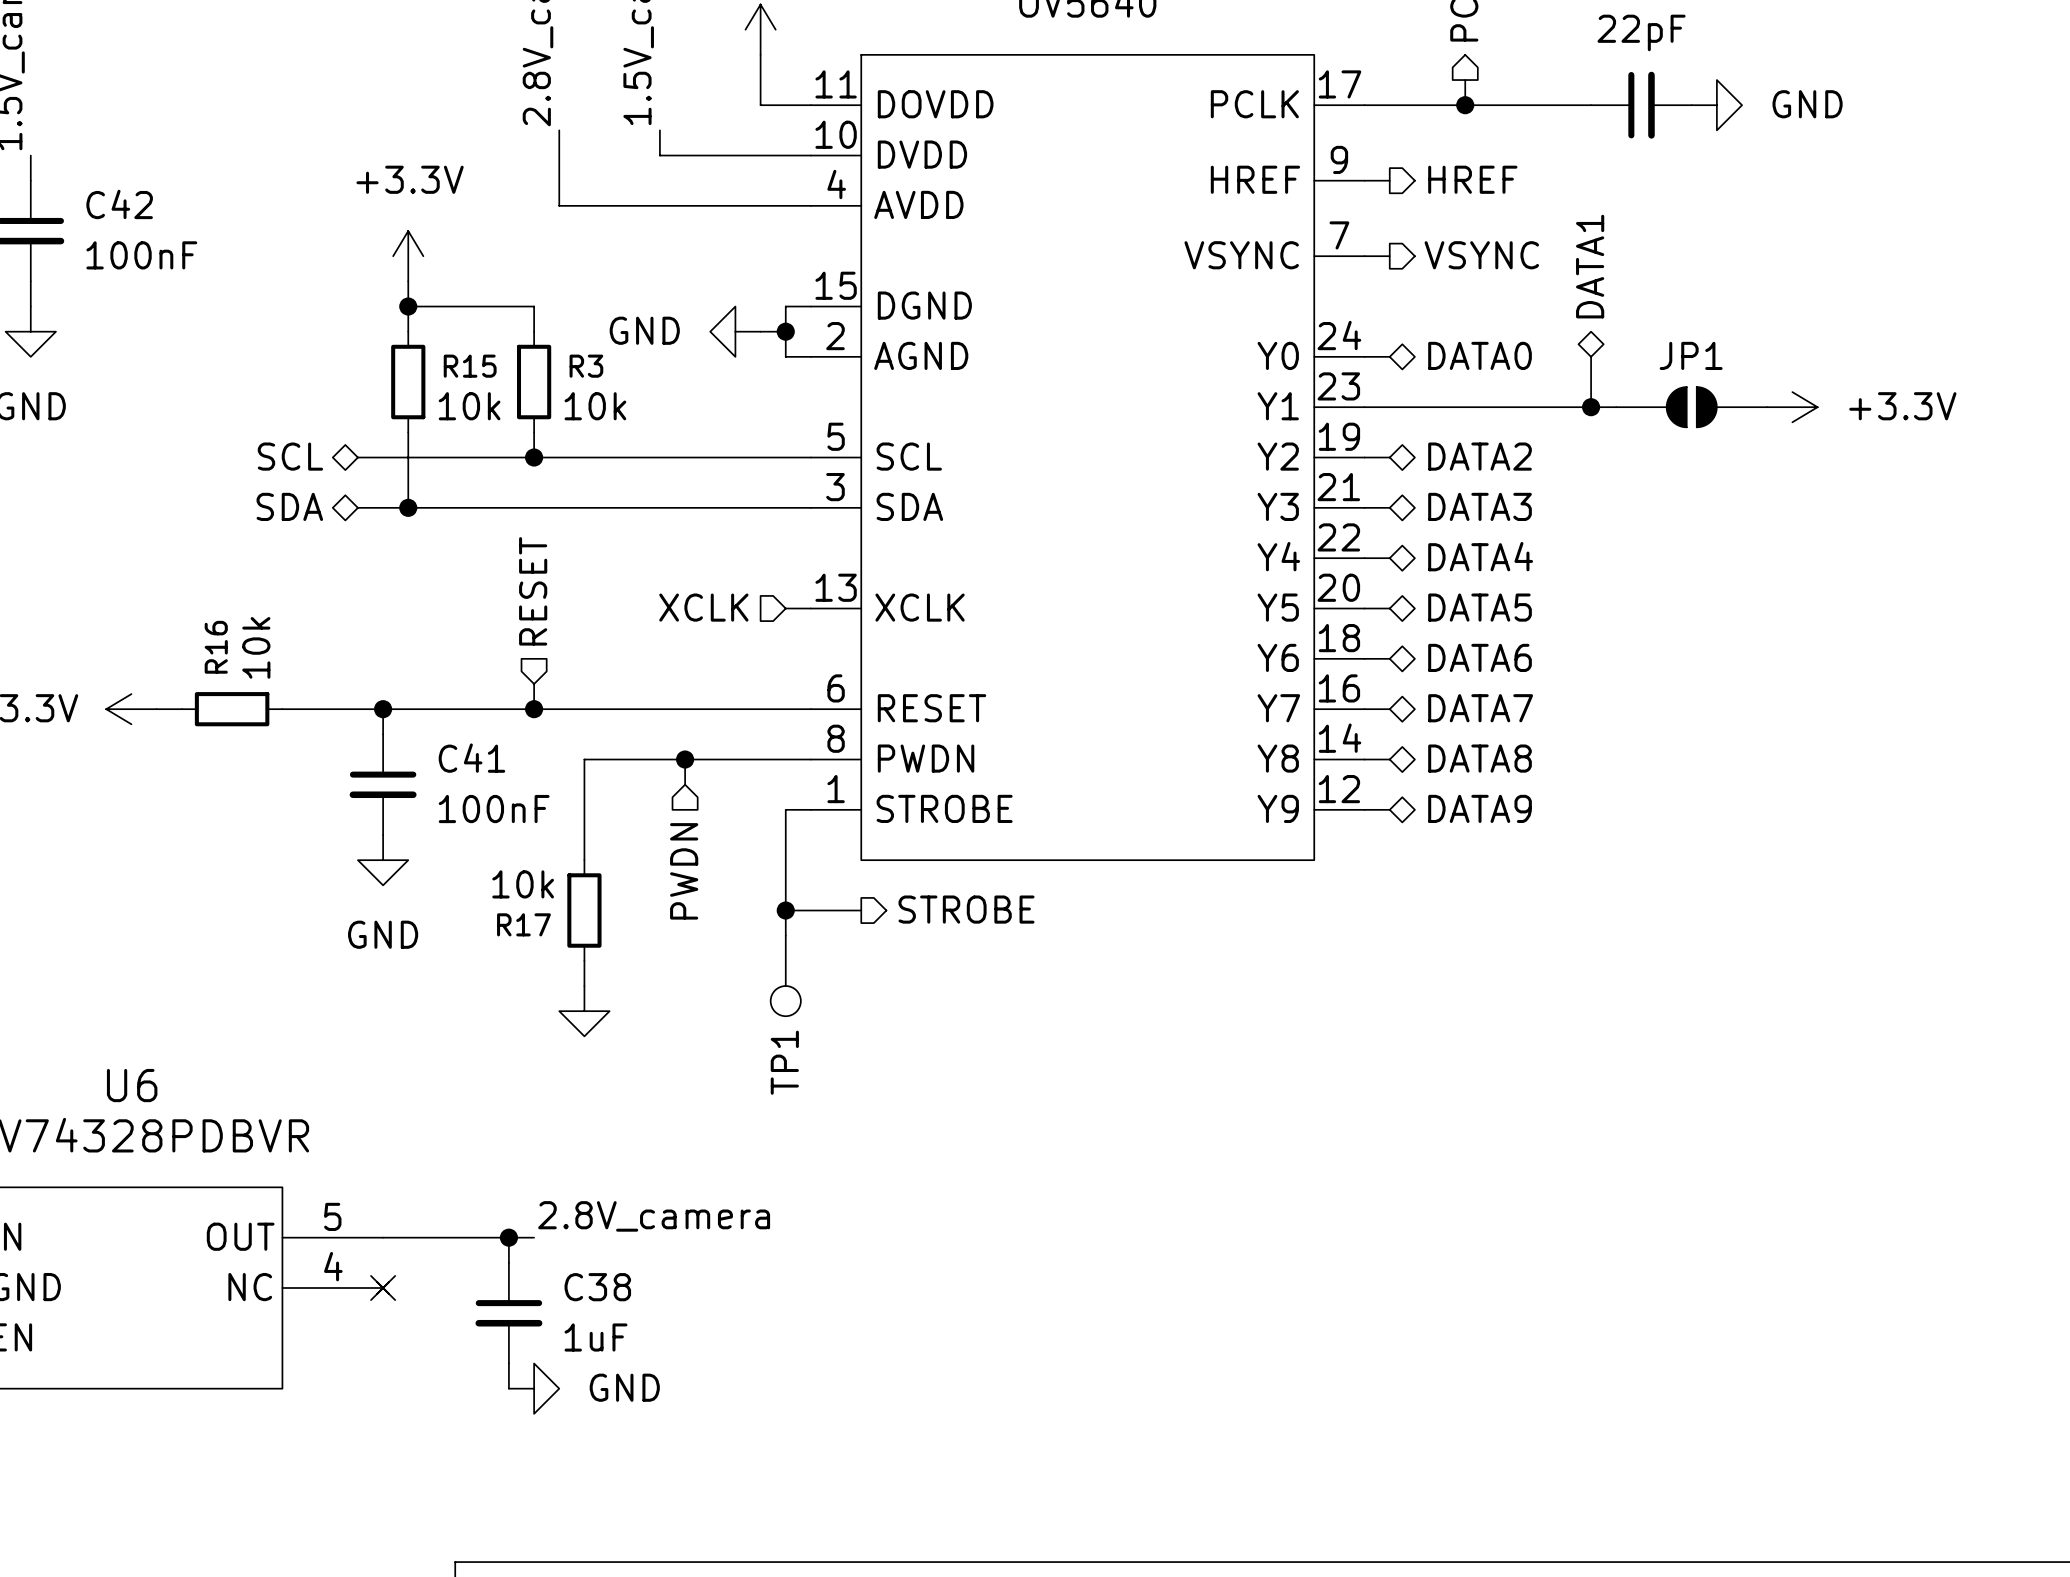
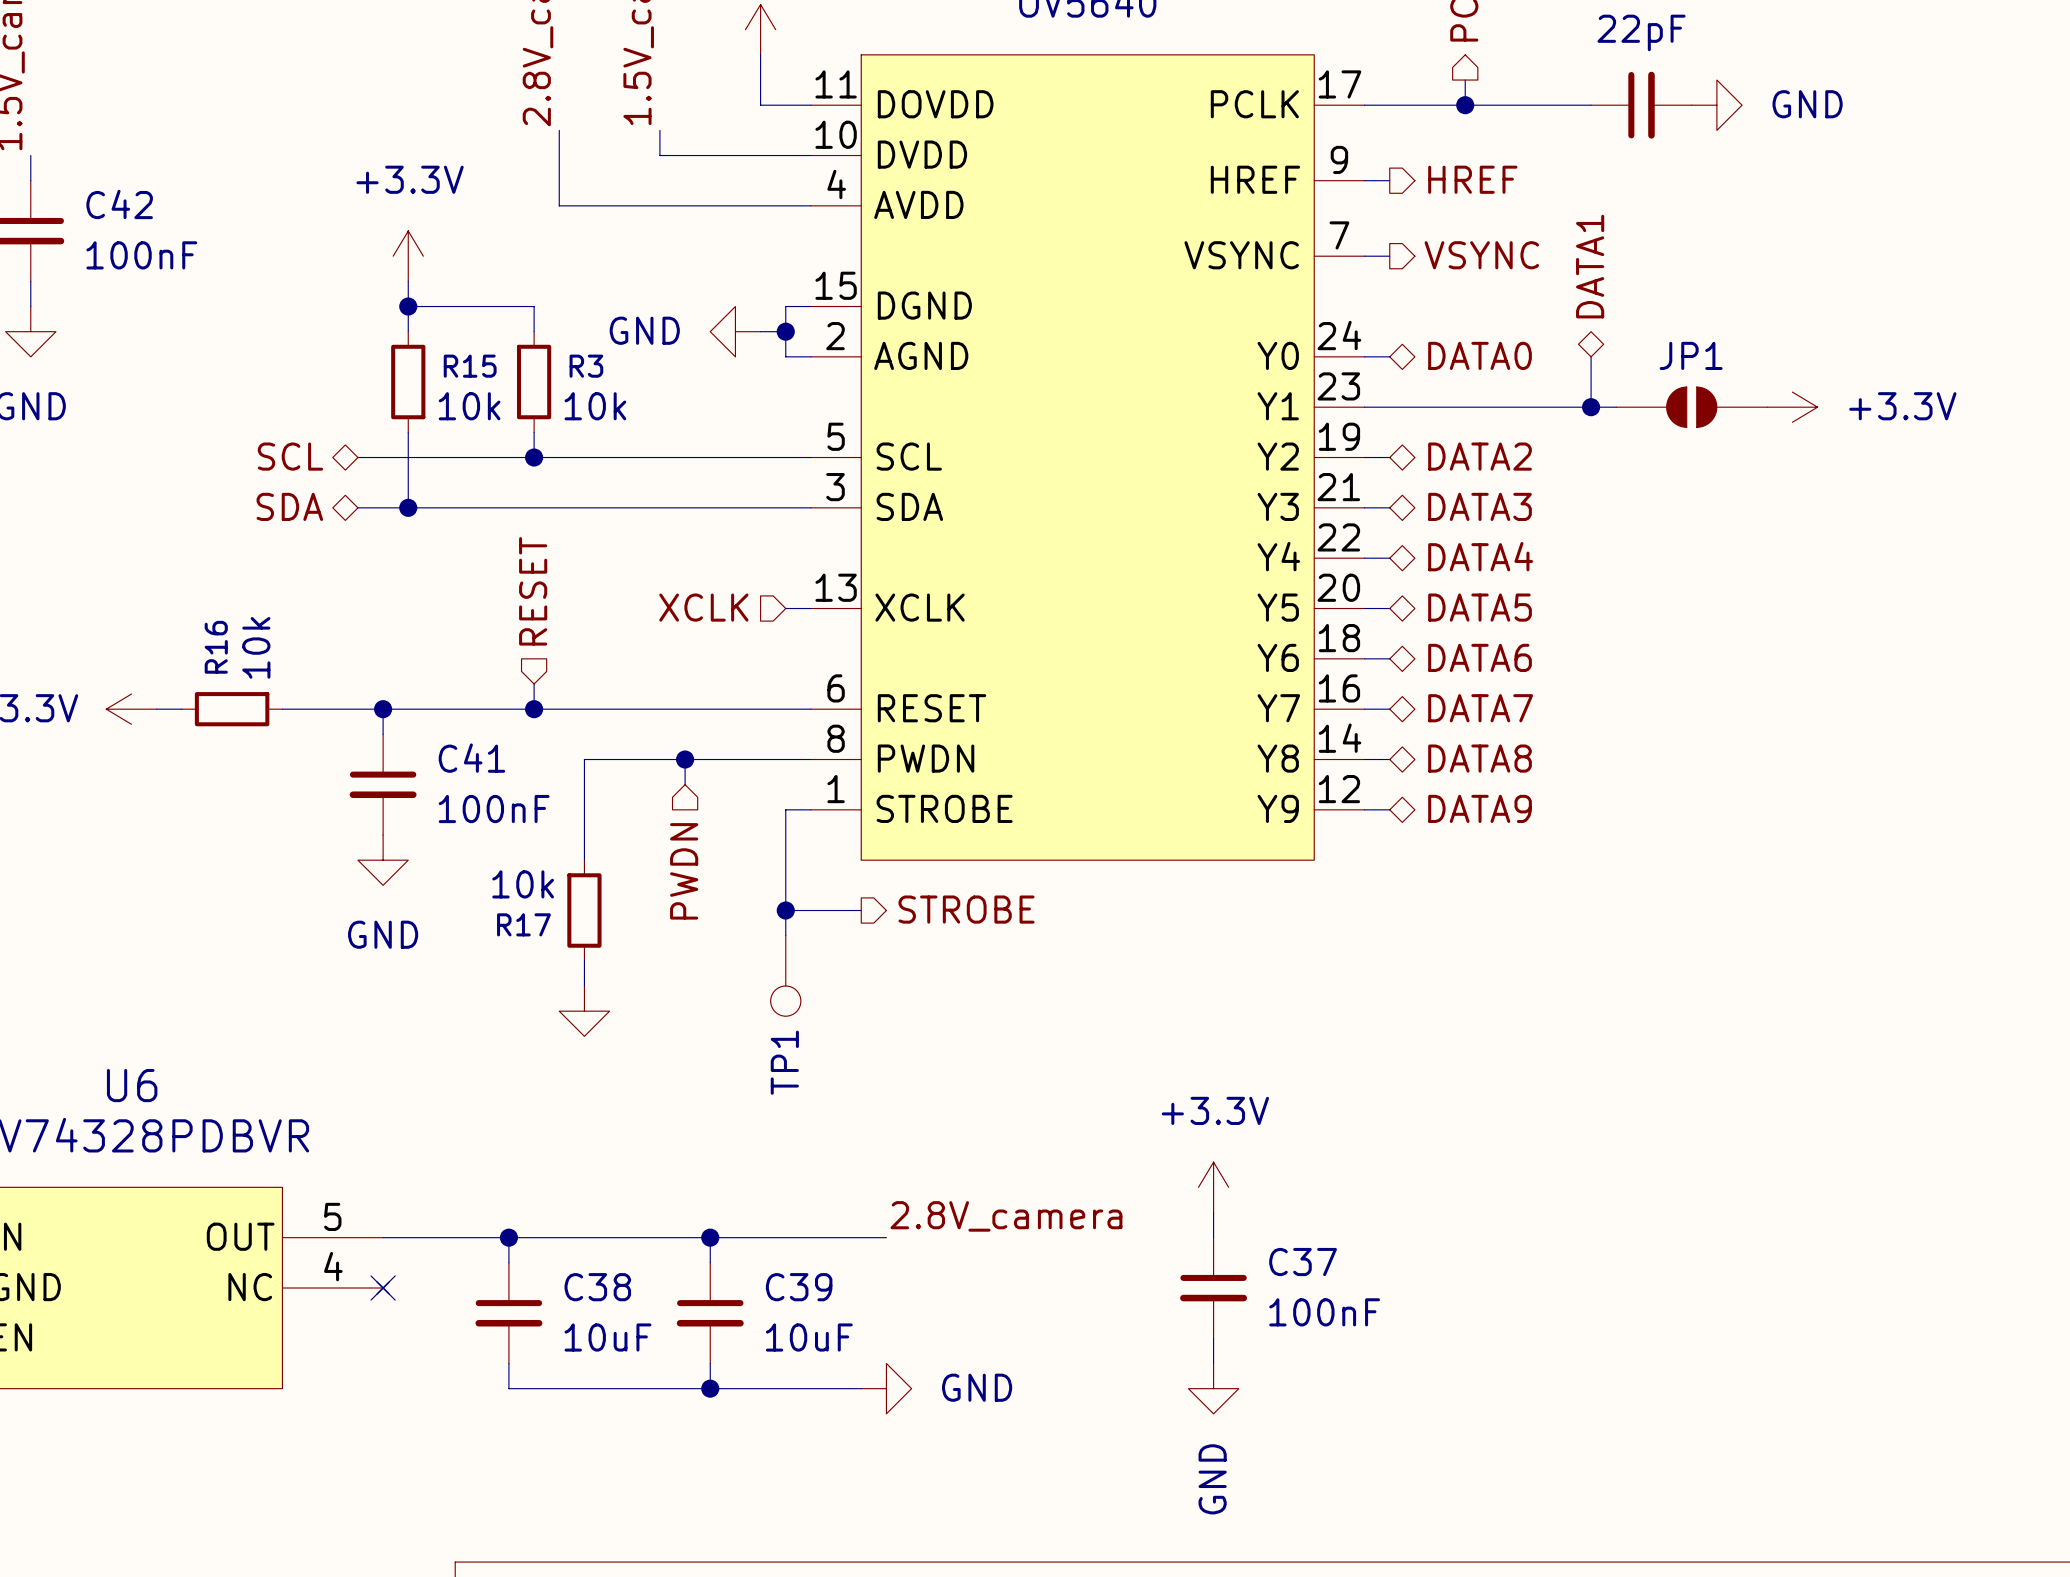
power symbol: none -> +3.3V (1213, 1187)
wire: none -> (1213, 1212) (1213, 1237)
label position: 2.8V_camera (654, 1216) -> 2.8V_camera (1006, 1216)
wire: none -> (534, 1237) (886, 1237)
wire: none -> (710, 1237) (710, 1262)
junction: none -> (710, 1237)
C37: none -> 100nF (1213, 1288)
C39: none -> 10uF (710, 1313)
C38 value: 1uF (596, 1337) -> 10uF (607, 1337)
wire: none -> (1213, 1338) (1213, 1363)
wire: none -> (710, 1363) (710, 1388)
wire: none -> (508, 1388) (861, 1388)
power symbol: GND (534, 1388) -> none
junction: none -> (710, 1388)
power symbol: none -> GND (886, 1388)
power symbol: none -> GND (1213, 1388)

